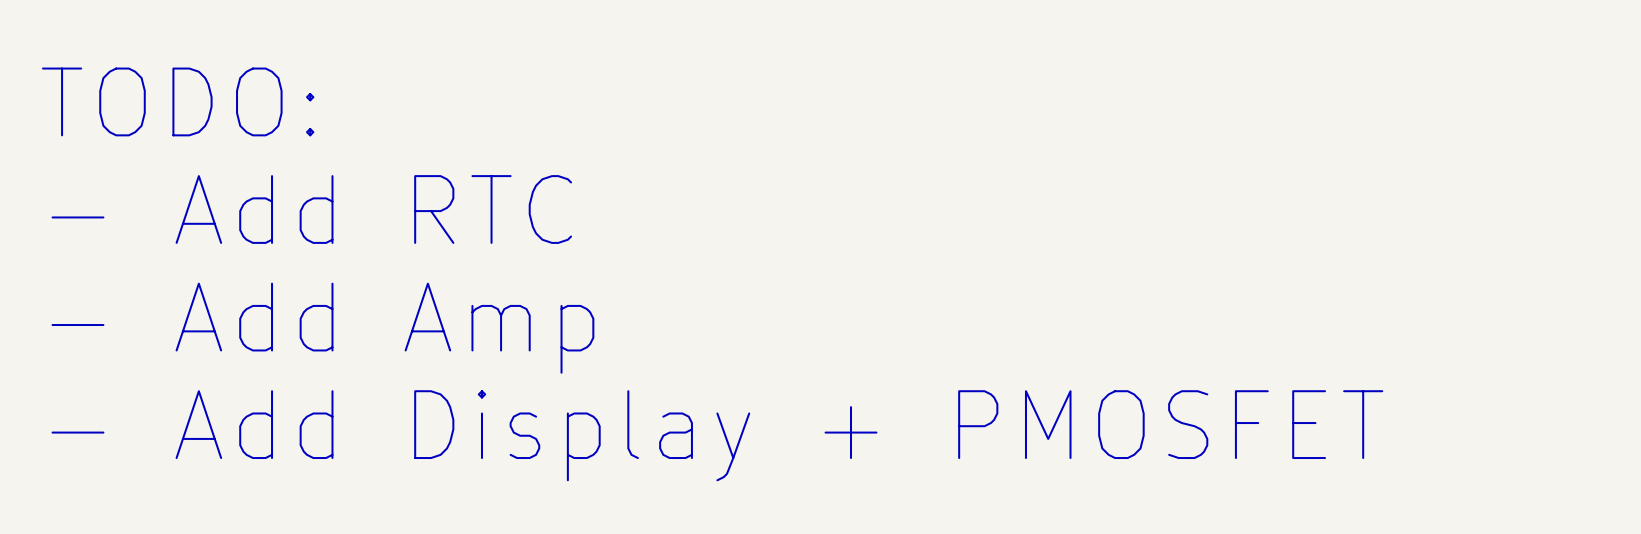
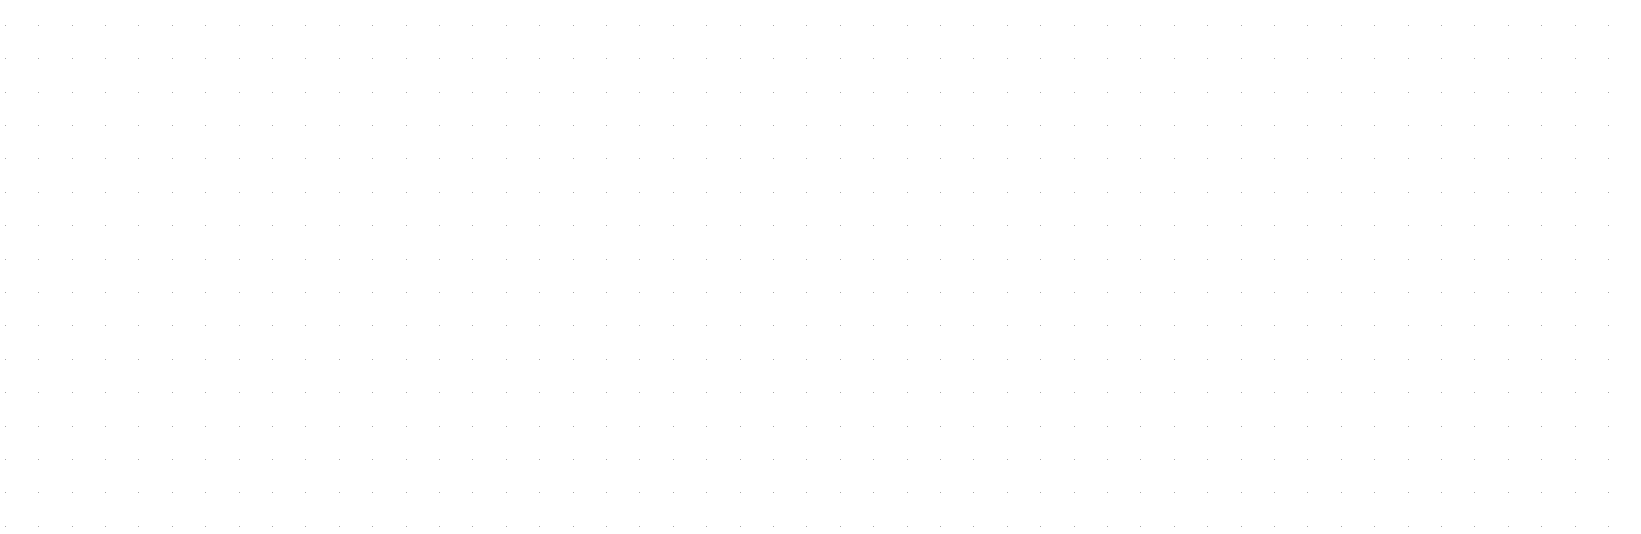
text: TODO: (178, 101) -> none
text: - Add RTC (311, 209) -> none
text: - Add Amp (322, 328) -> none
text: - Add Display + PMOSFET (717, 435) -> none

